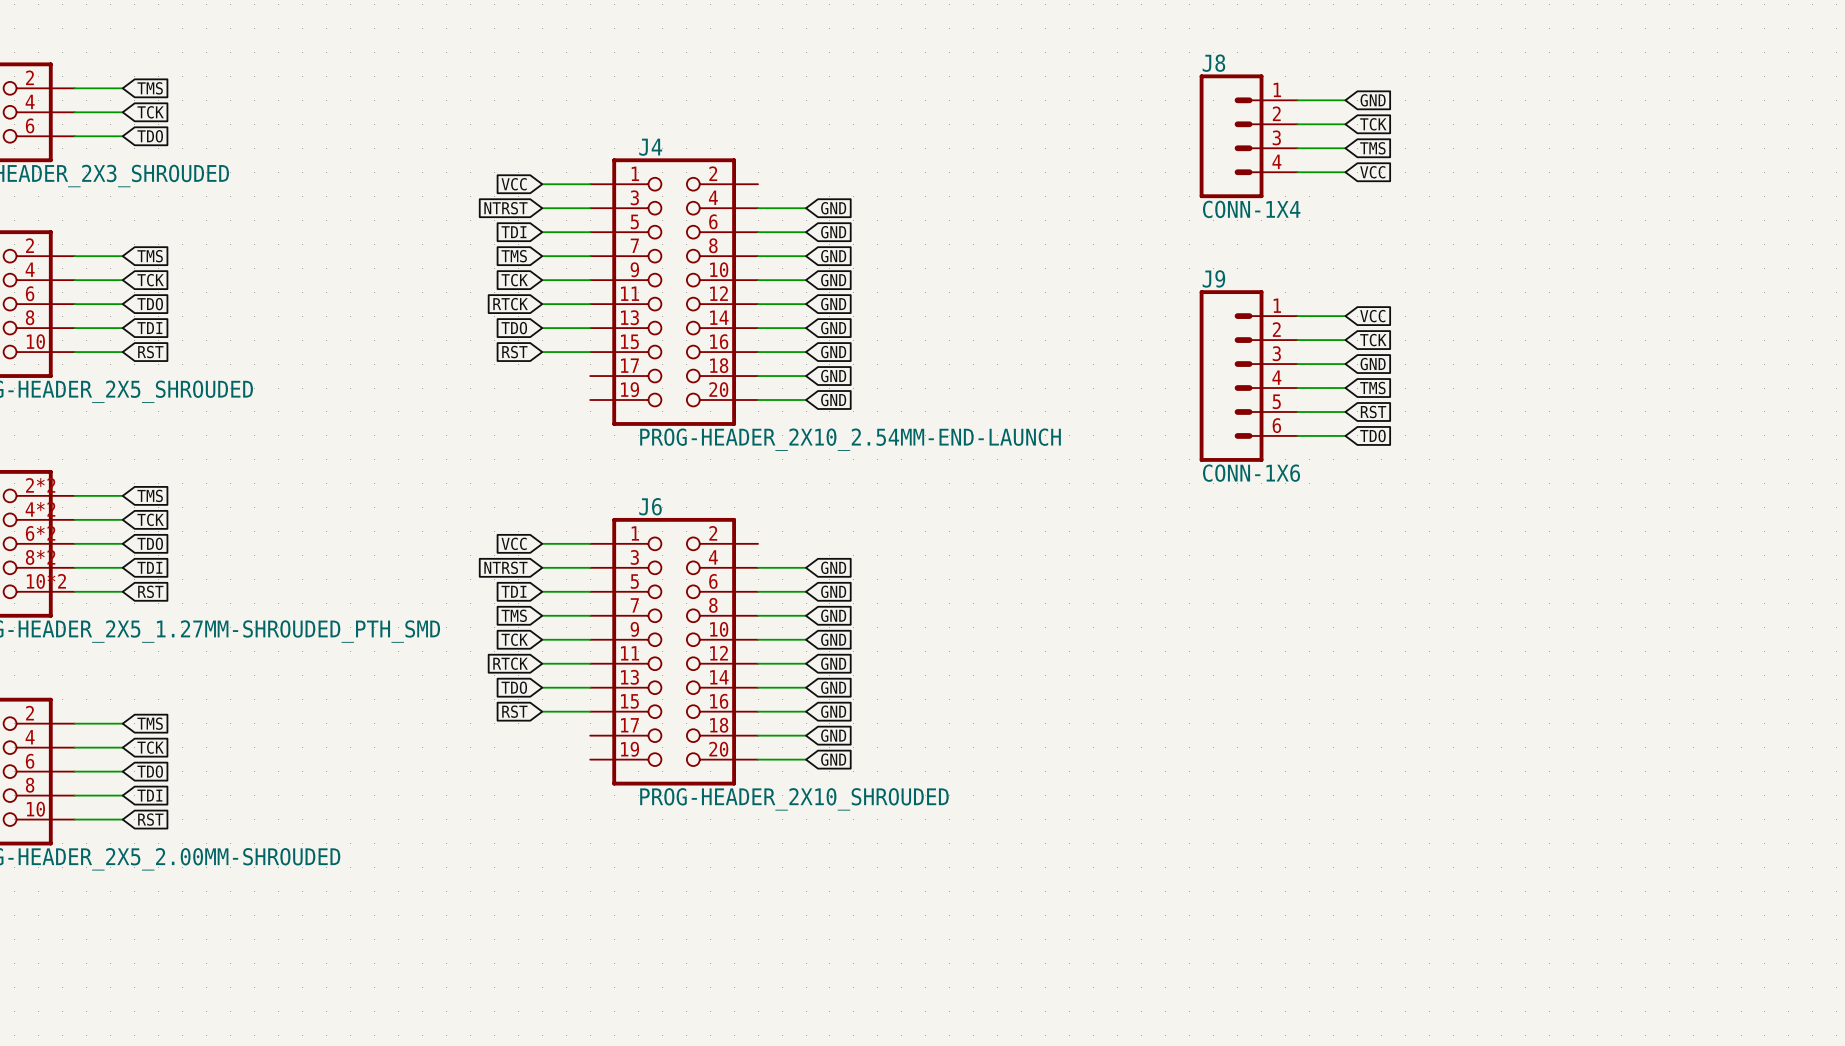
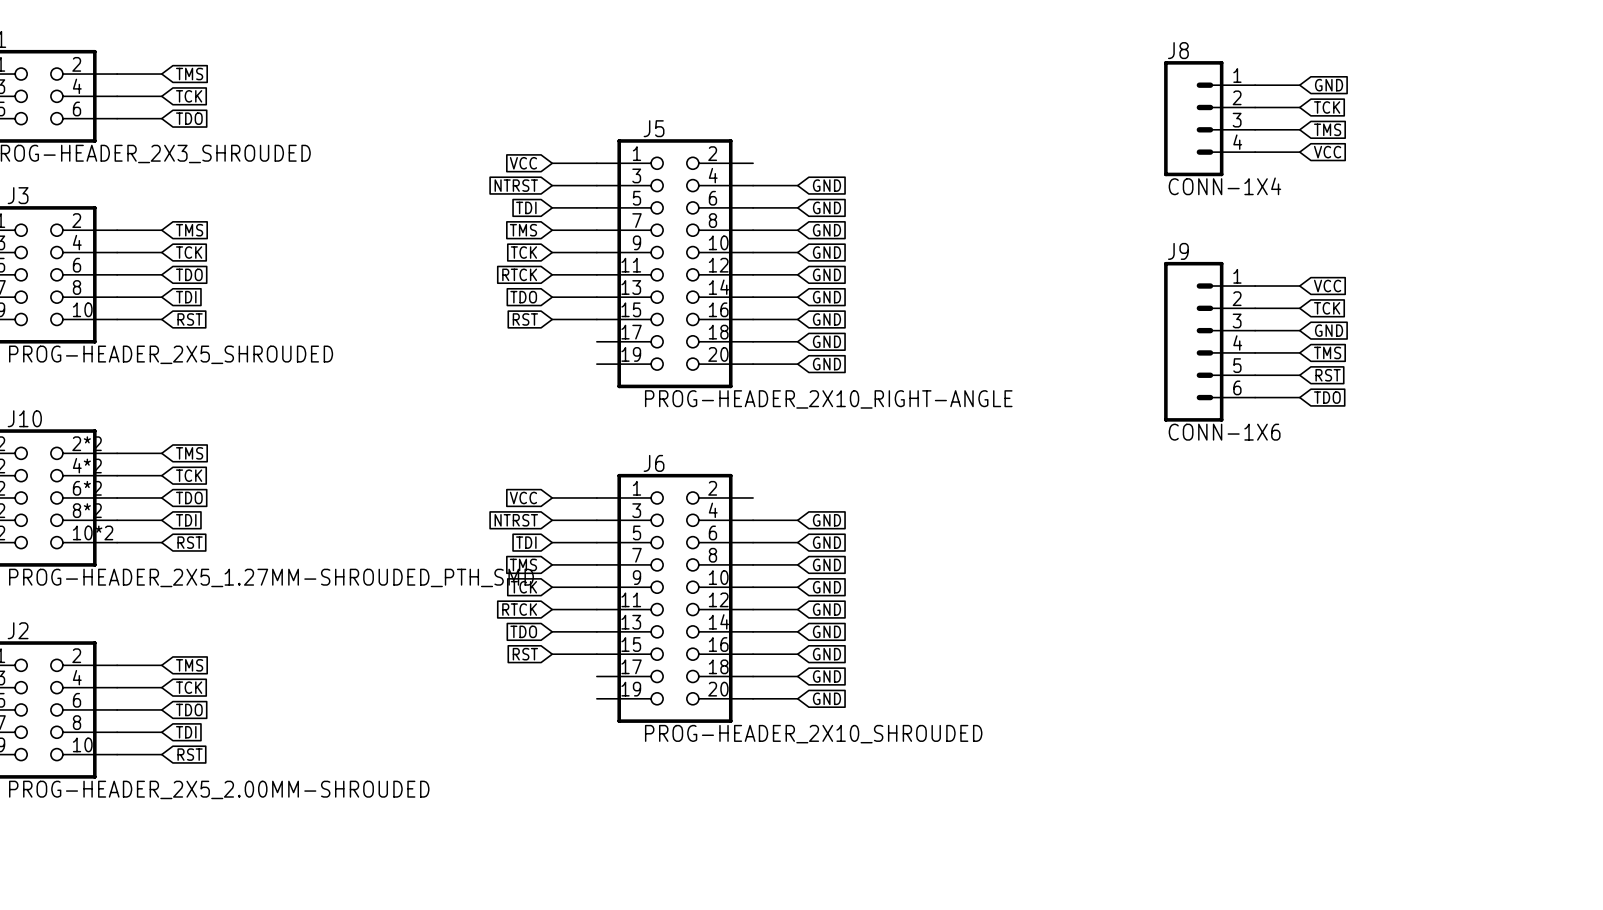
J4 name: J4 (650, 147) -> J5 (654, 128)
J4 value: PROG-HEADER_2X10_2.54MM-END-LAUNCH (850, 439) -> PROG-HEADER_2X10_RIGHT-ANGLE (828, 399)

